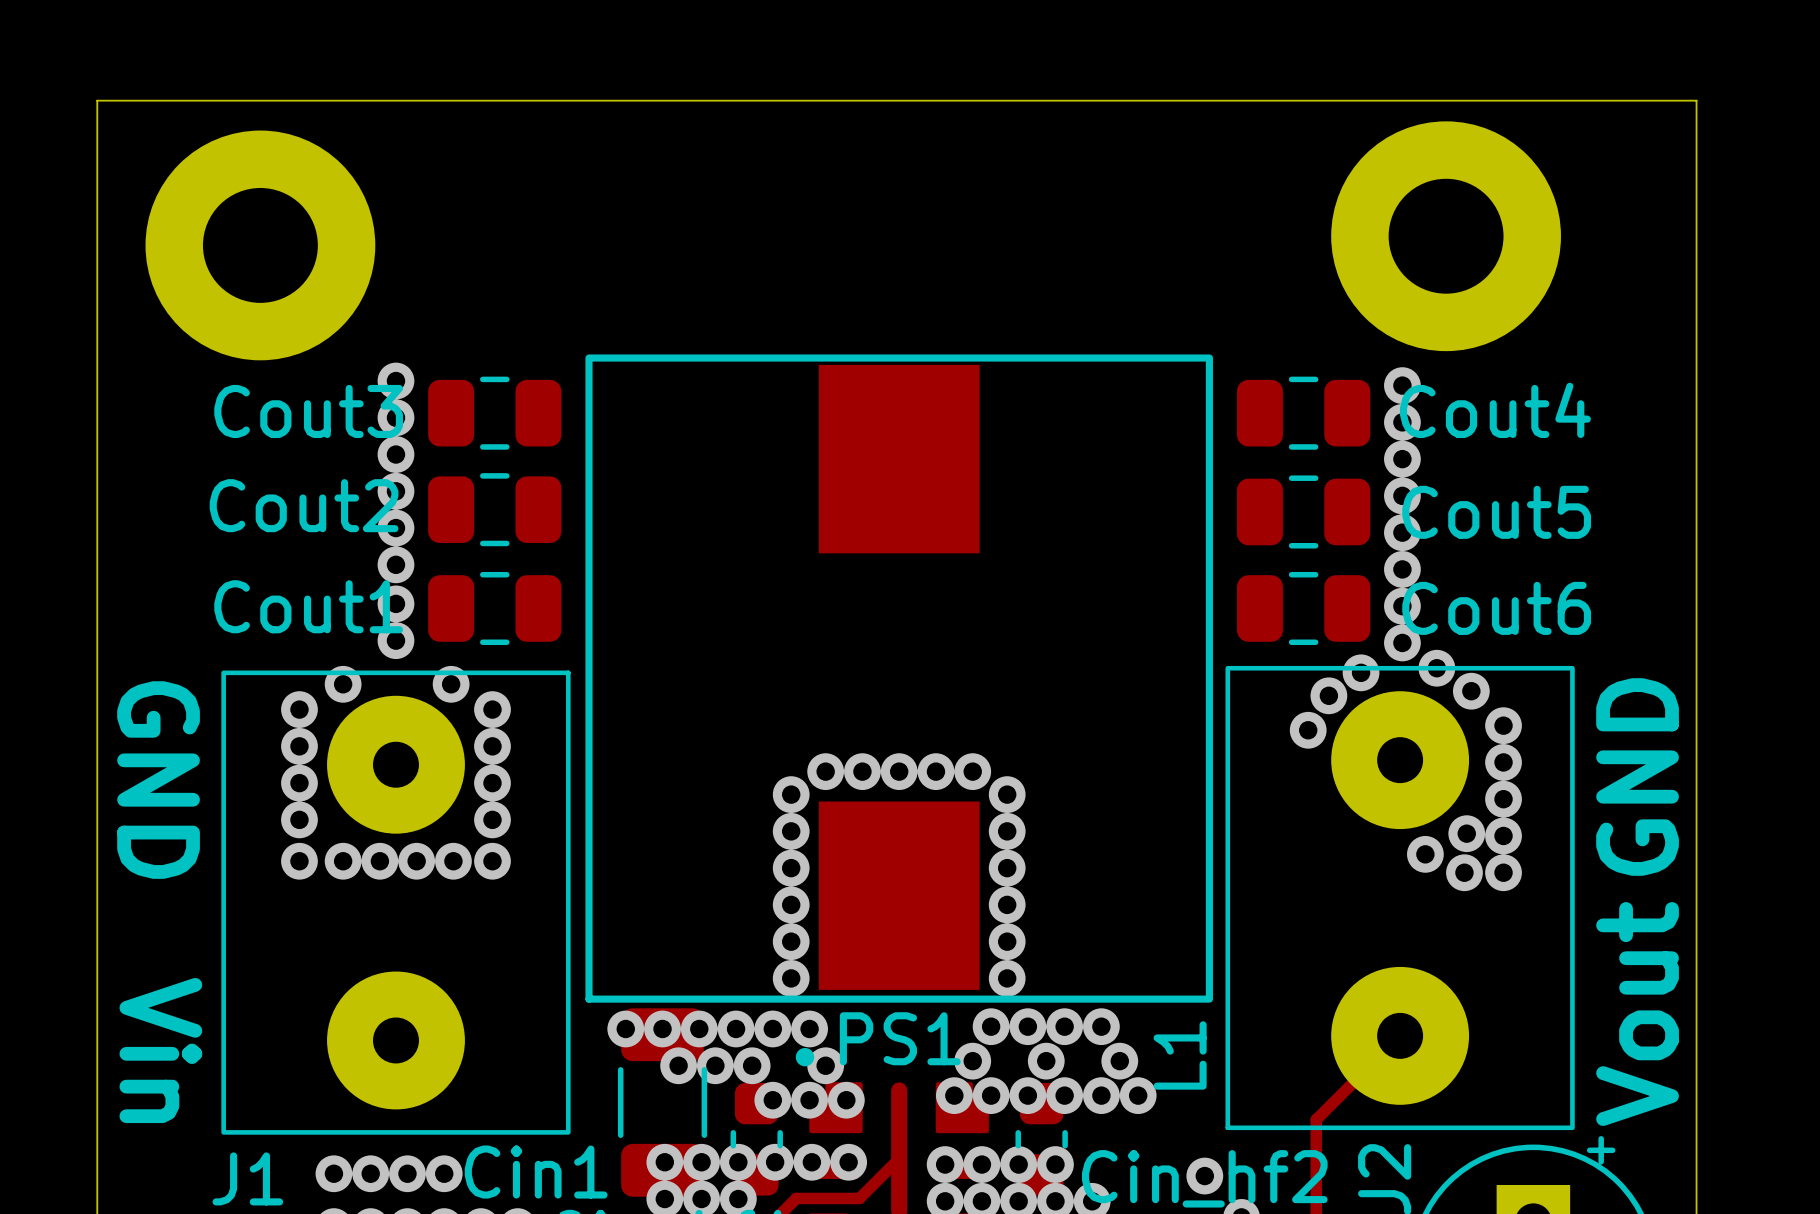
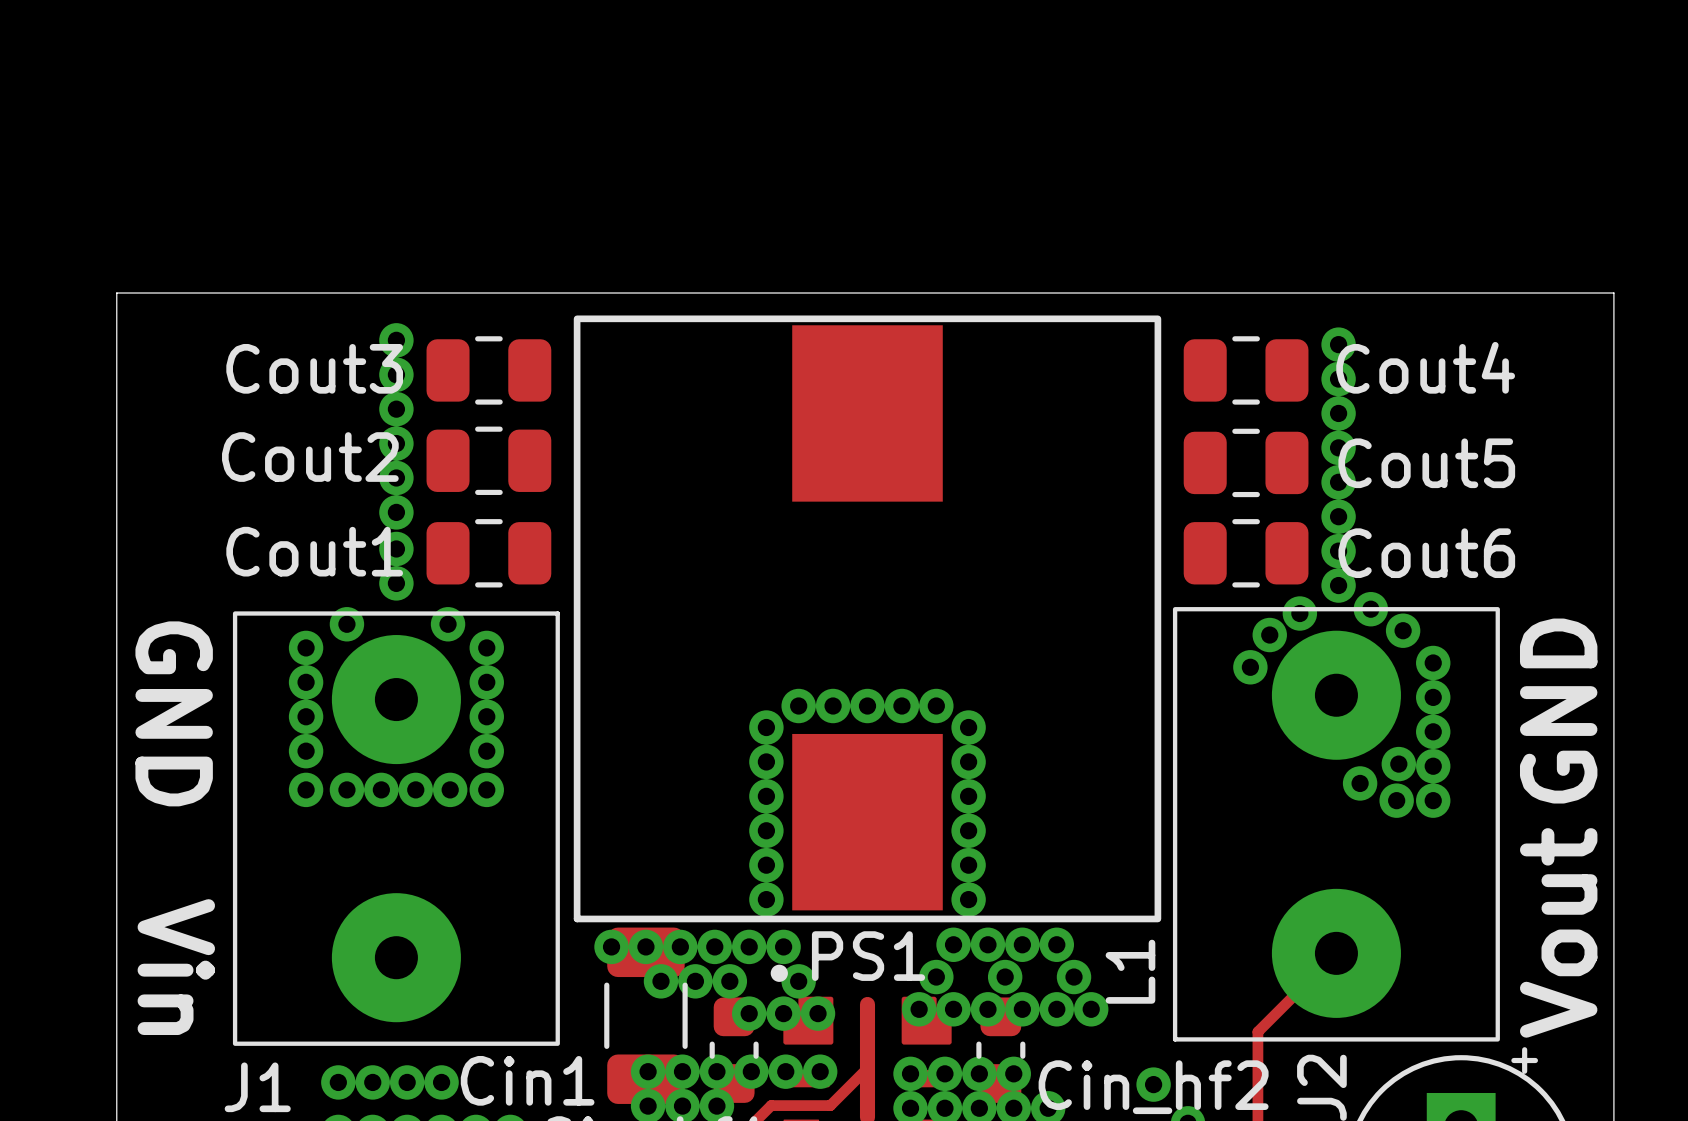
part: (1446, 236) -> none
part: (260, 245) -> none
board edge: (97, 330) (97, 100) (1696, 100) (1696, 330) -> (116, 293) (1613, 293)

